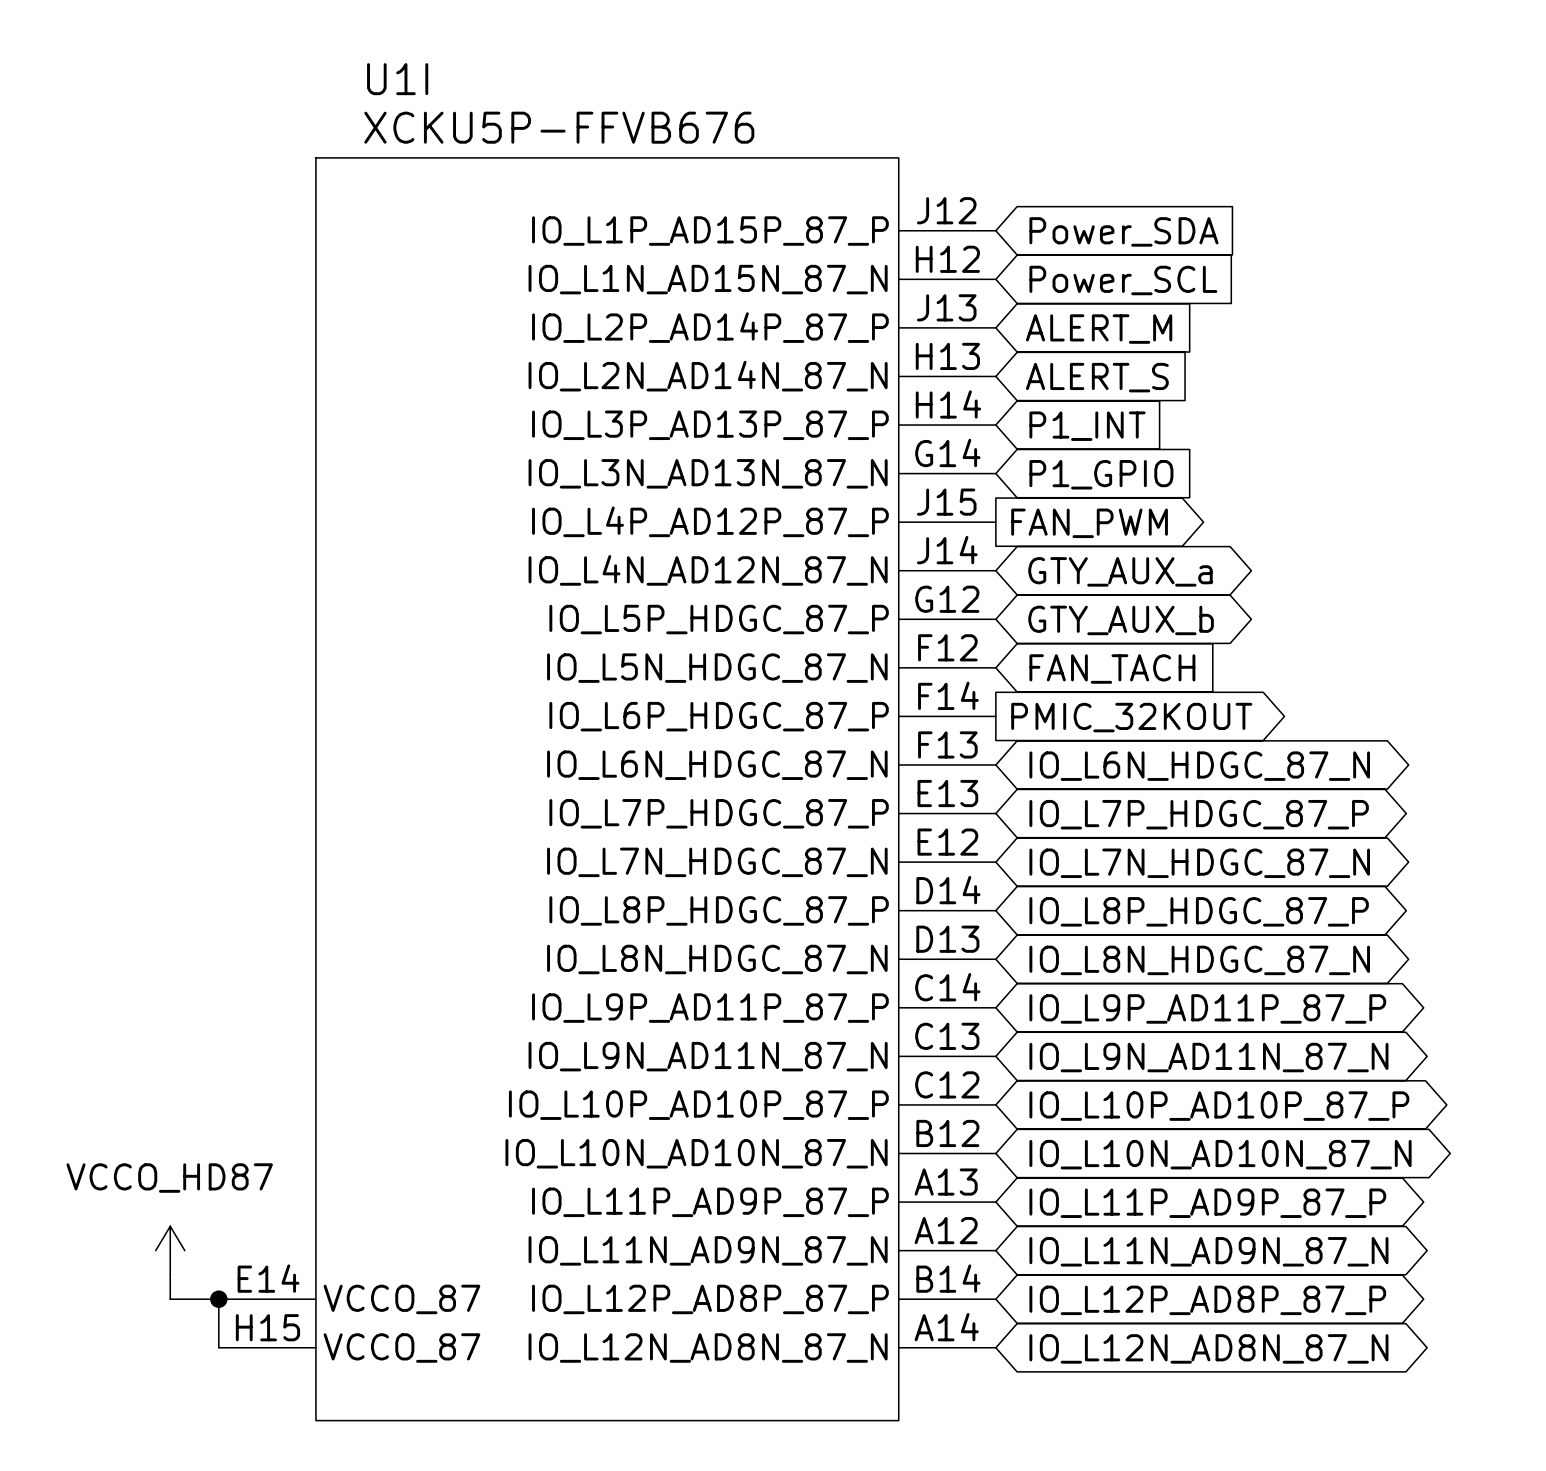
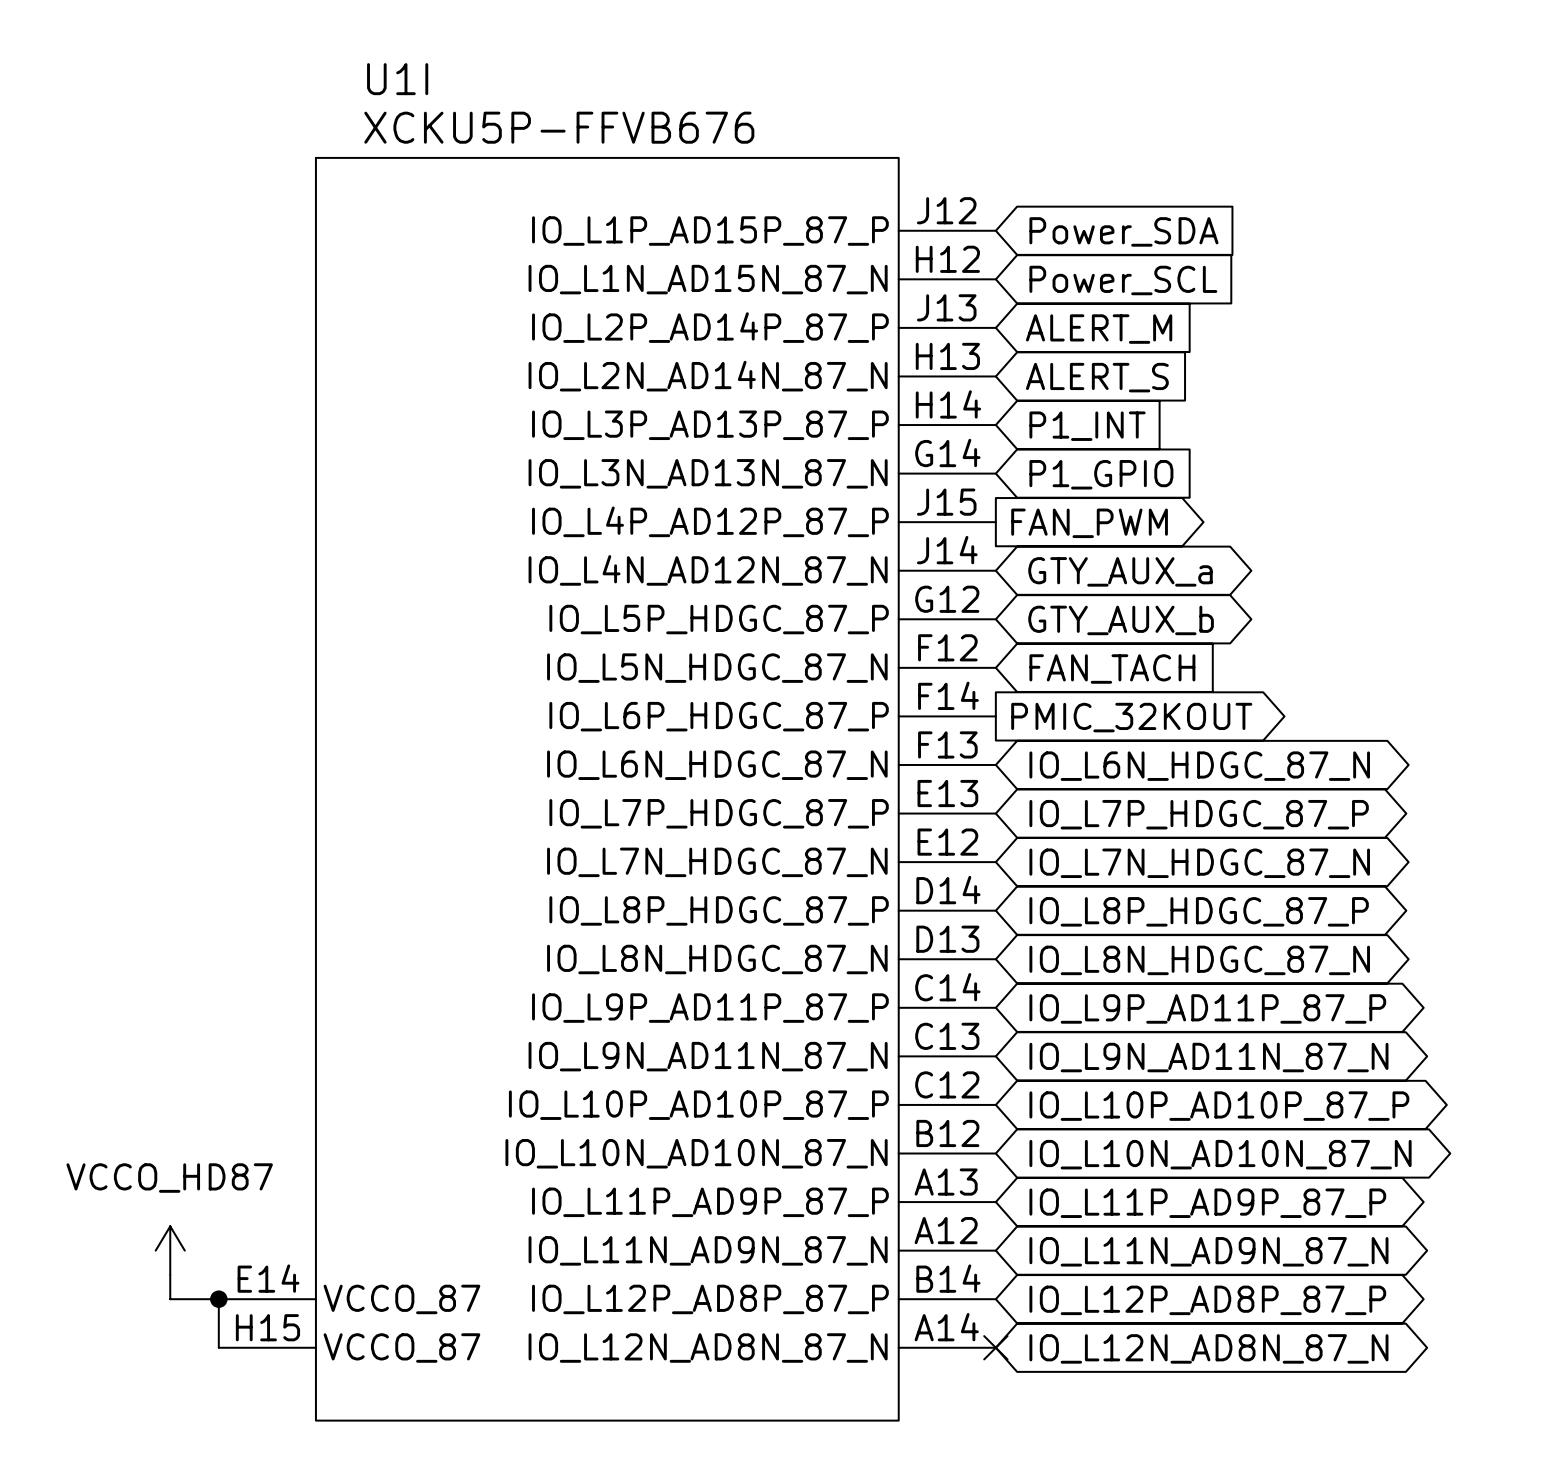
no-connect mark: none -> (995, 1347)

